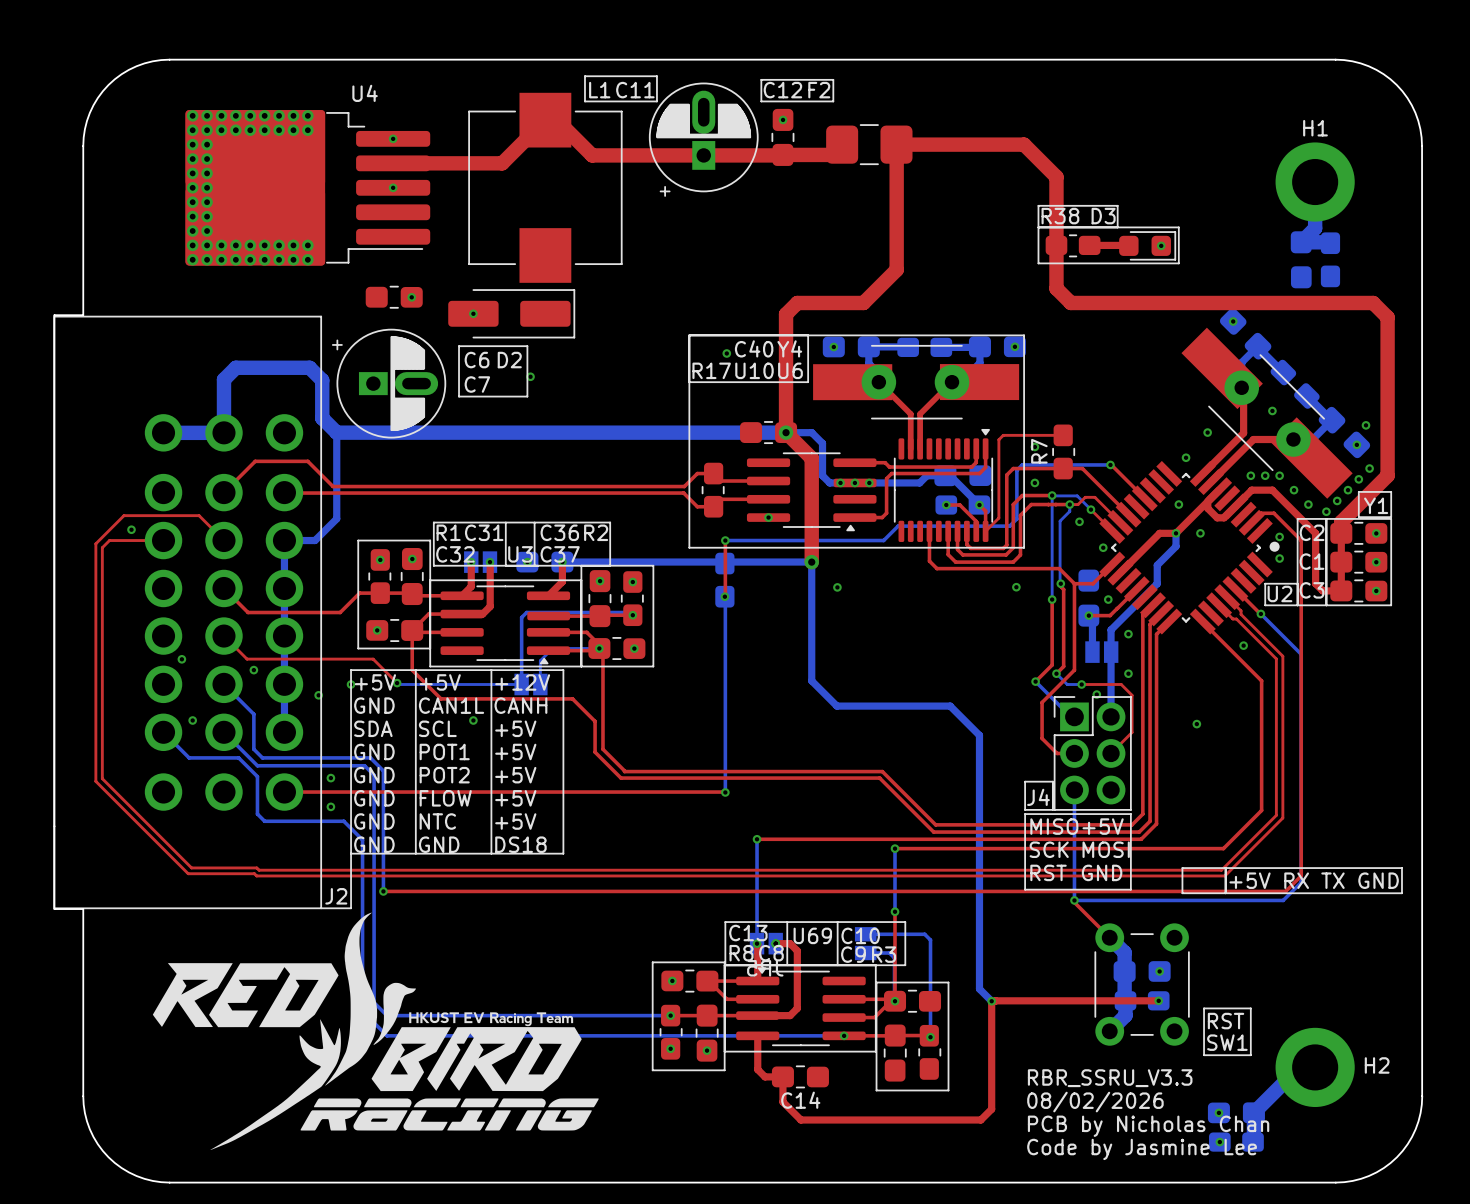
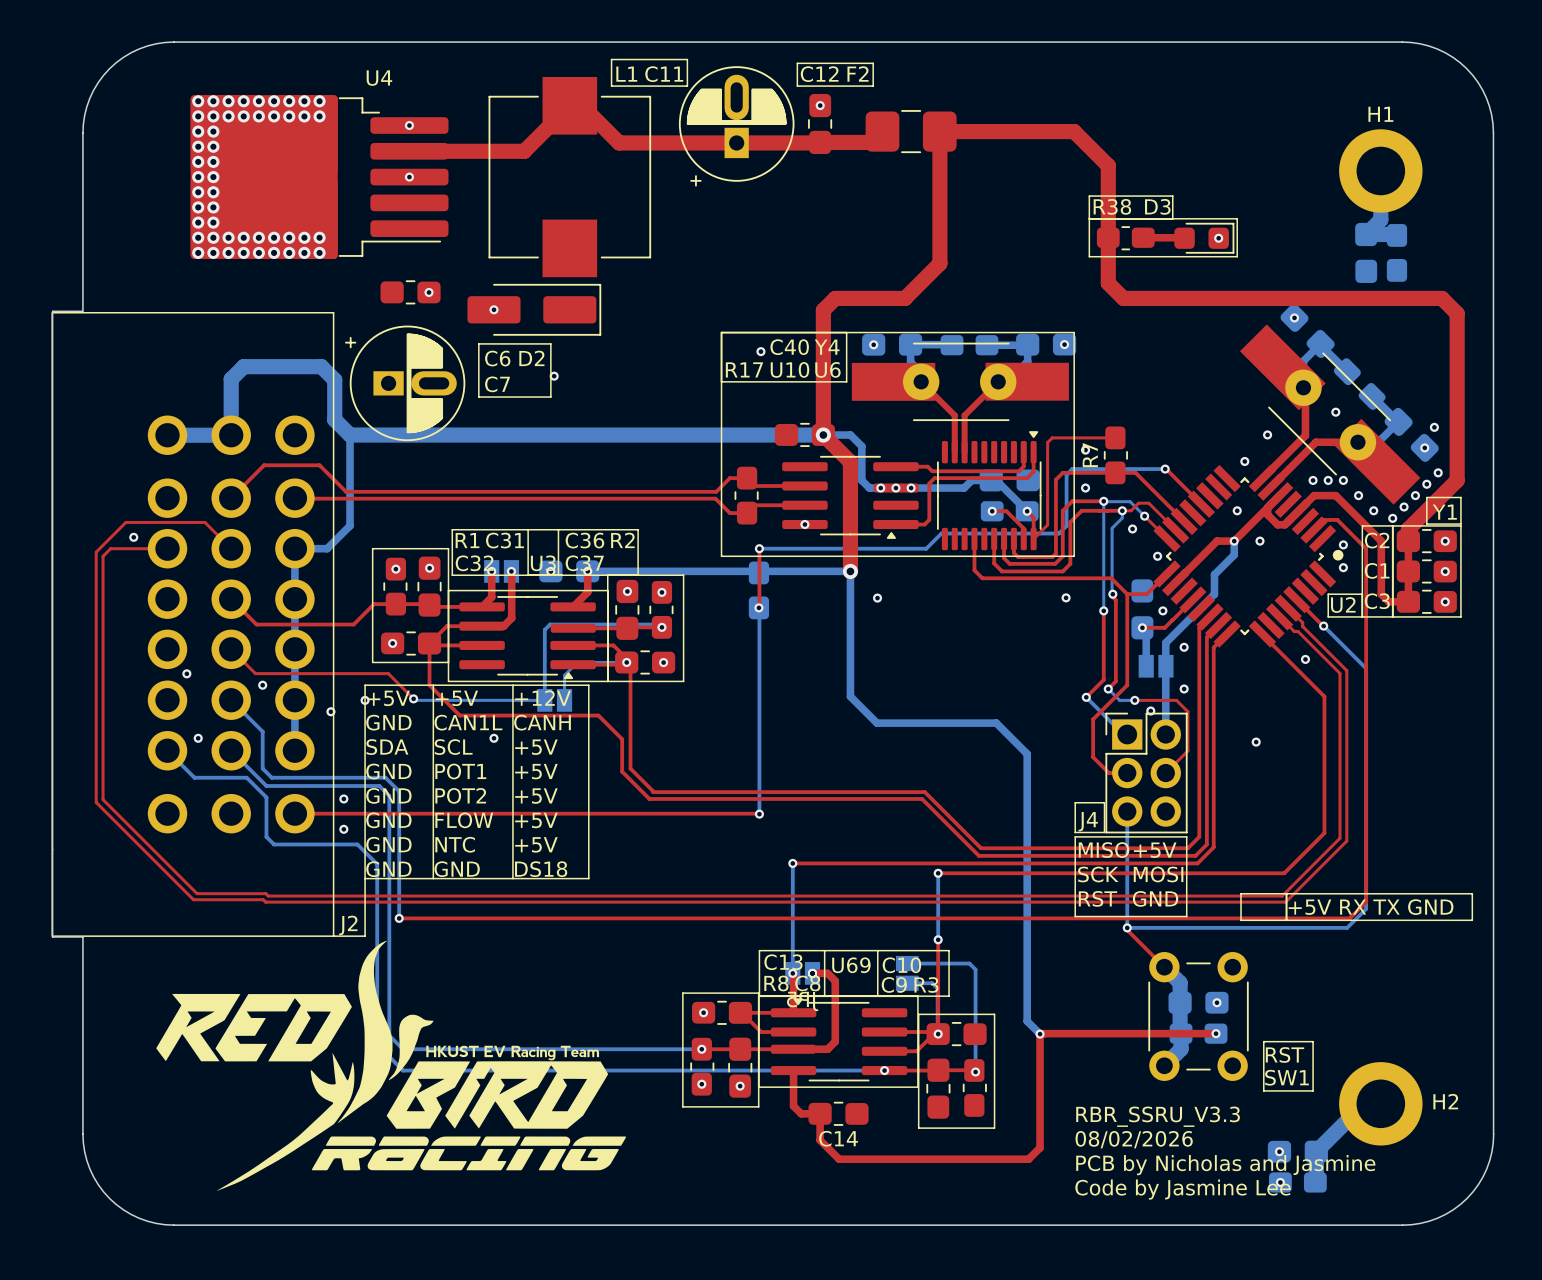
text: PCB by Nicholas Chan (1148, 1126) -> PCB by Nicholas and Jasmine (1225, 1165)

